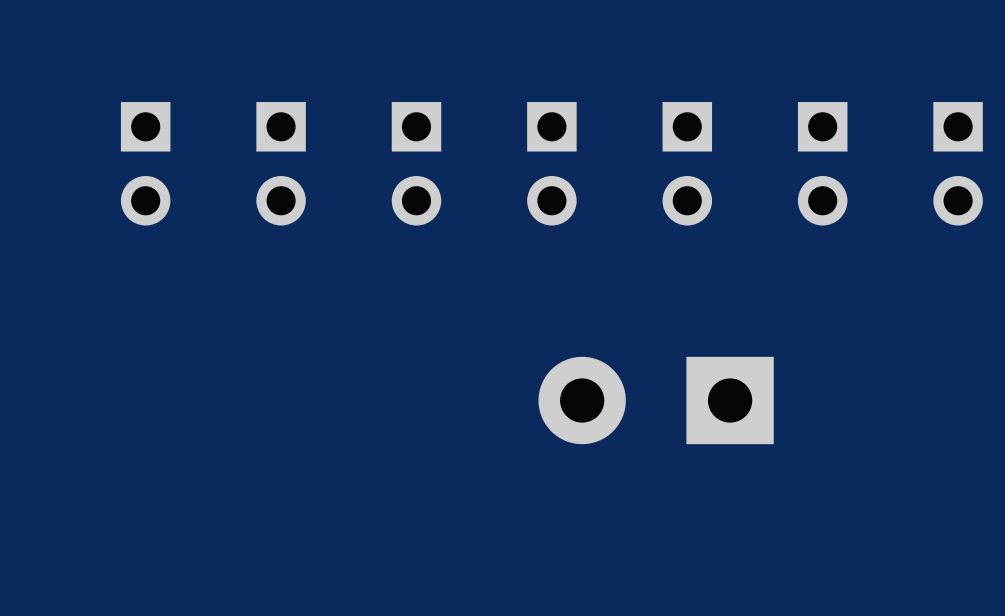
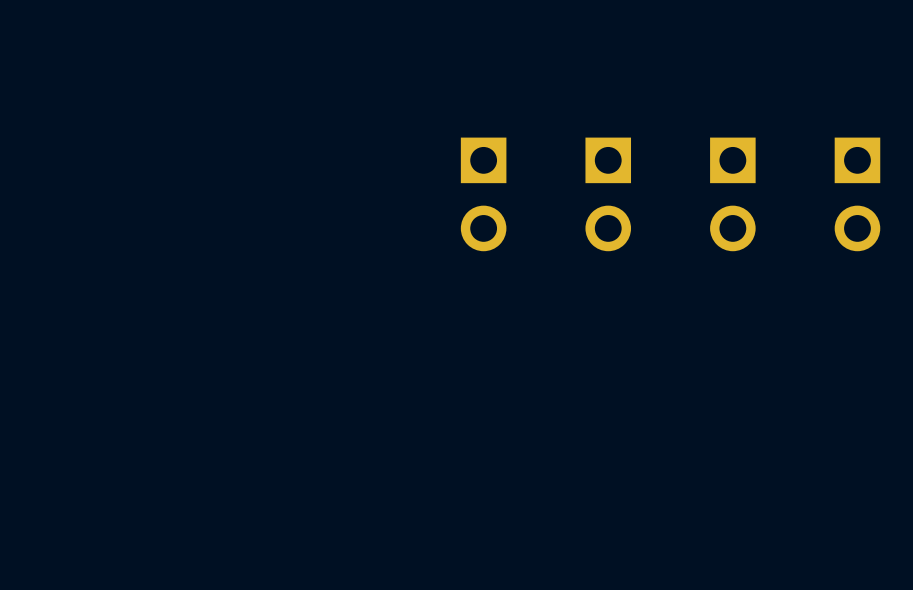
part: (145, 163) -> none
part: (281, 163) -> none
part: (416, 163) -> none
part: (656, 400) -> none

